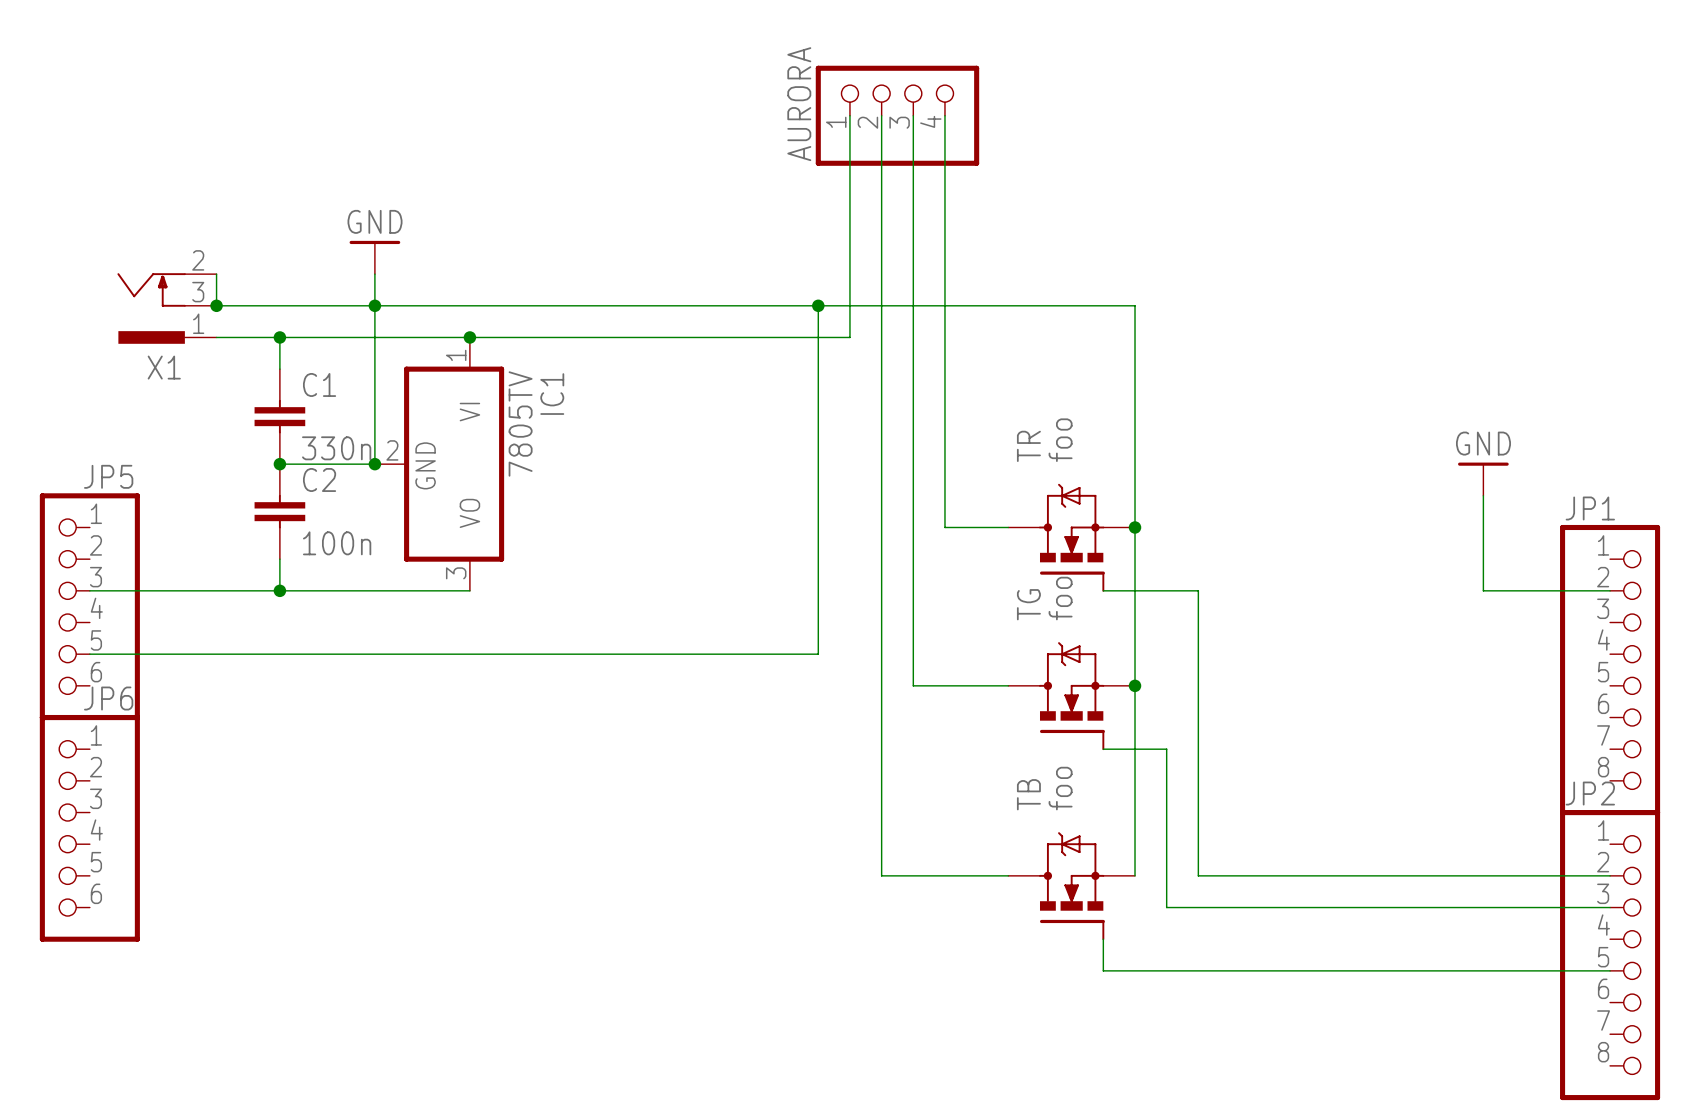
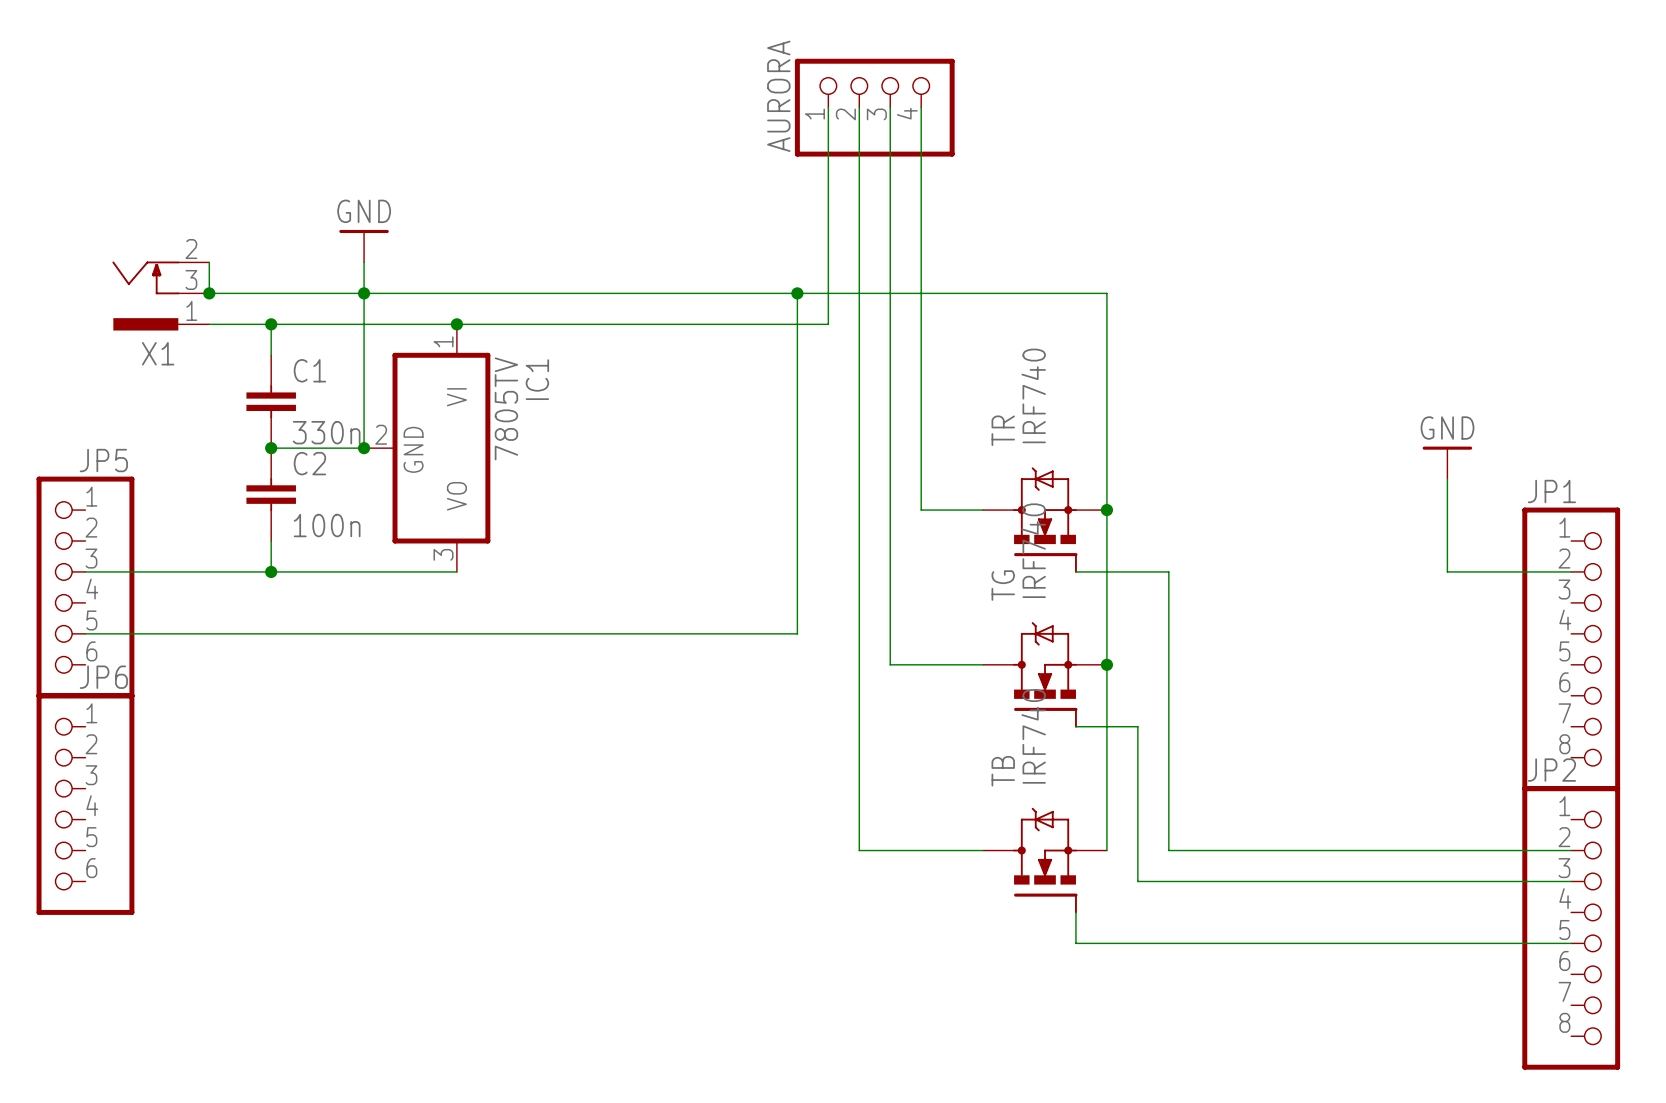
TR value: foo (1060, 440) -> IRF740 (1033, 395)
TG value: foo (1060, 598) -> IRF740 (1033, 550)
TB value: foo (1060, 788) -> IRF740 (1033, 736)

